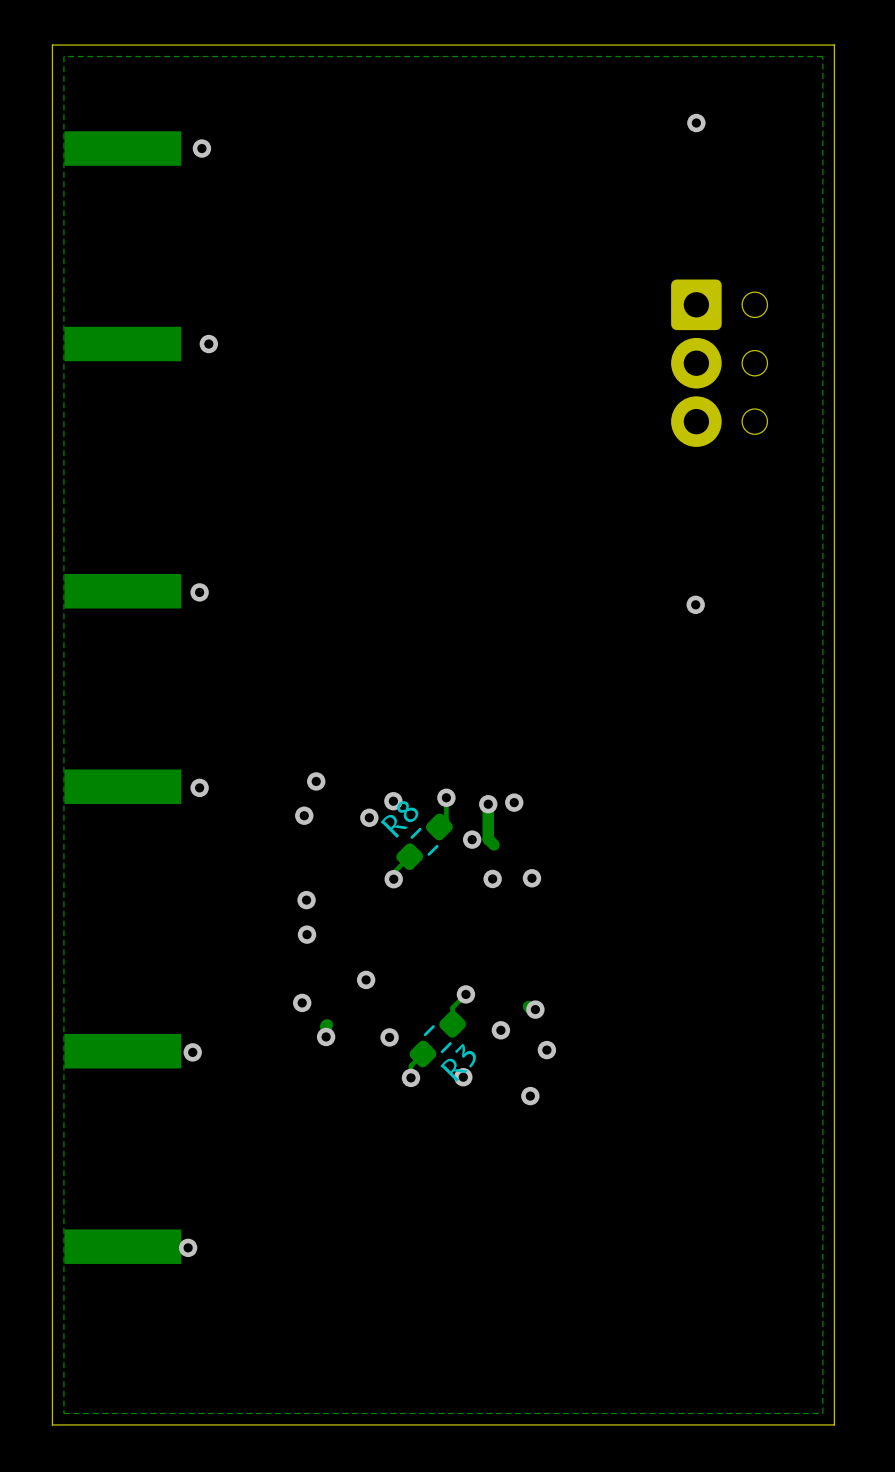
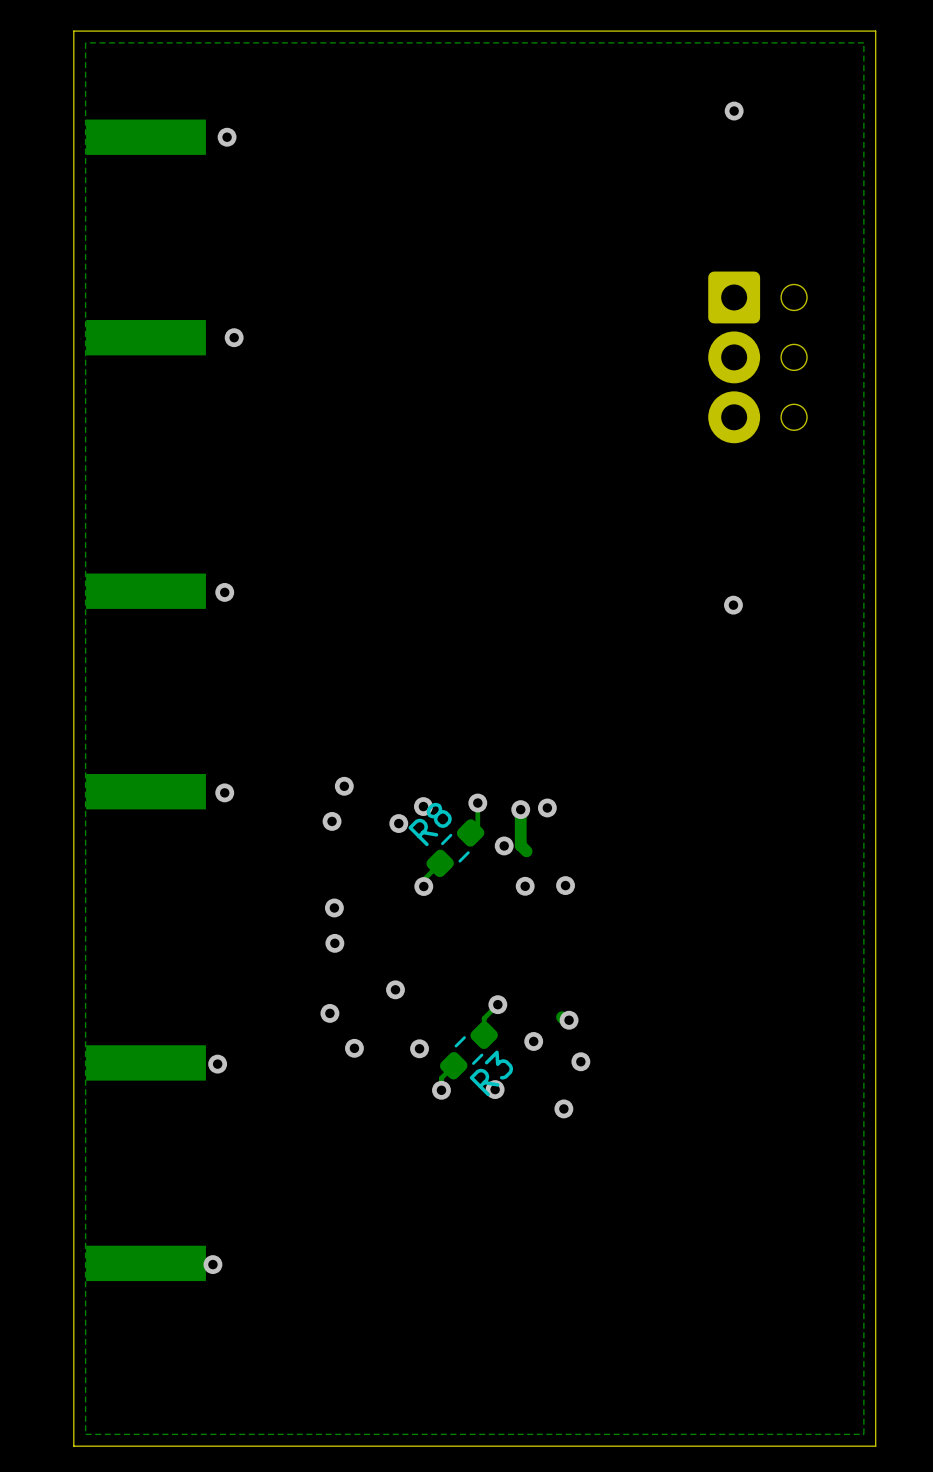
track: (327, 1024) (326, 1036) -> none

